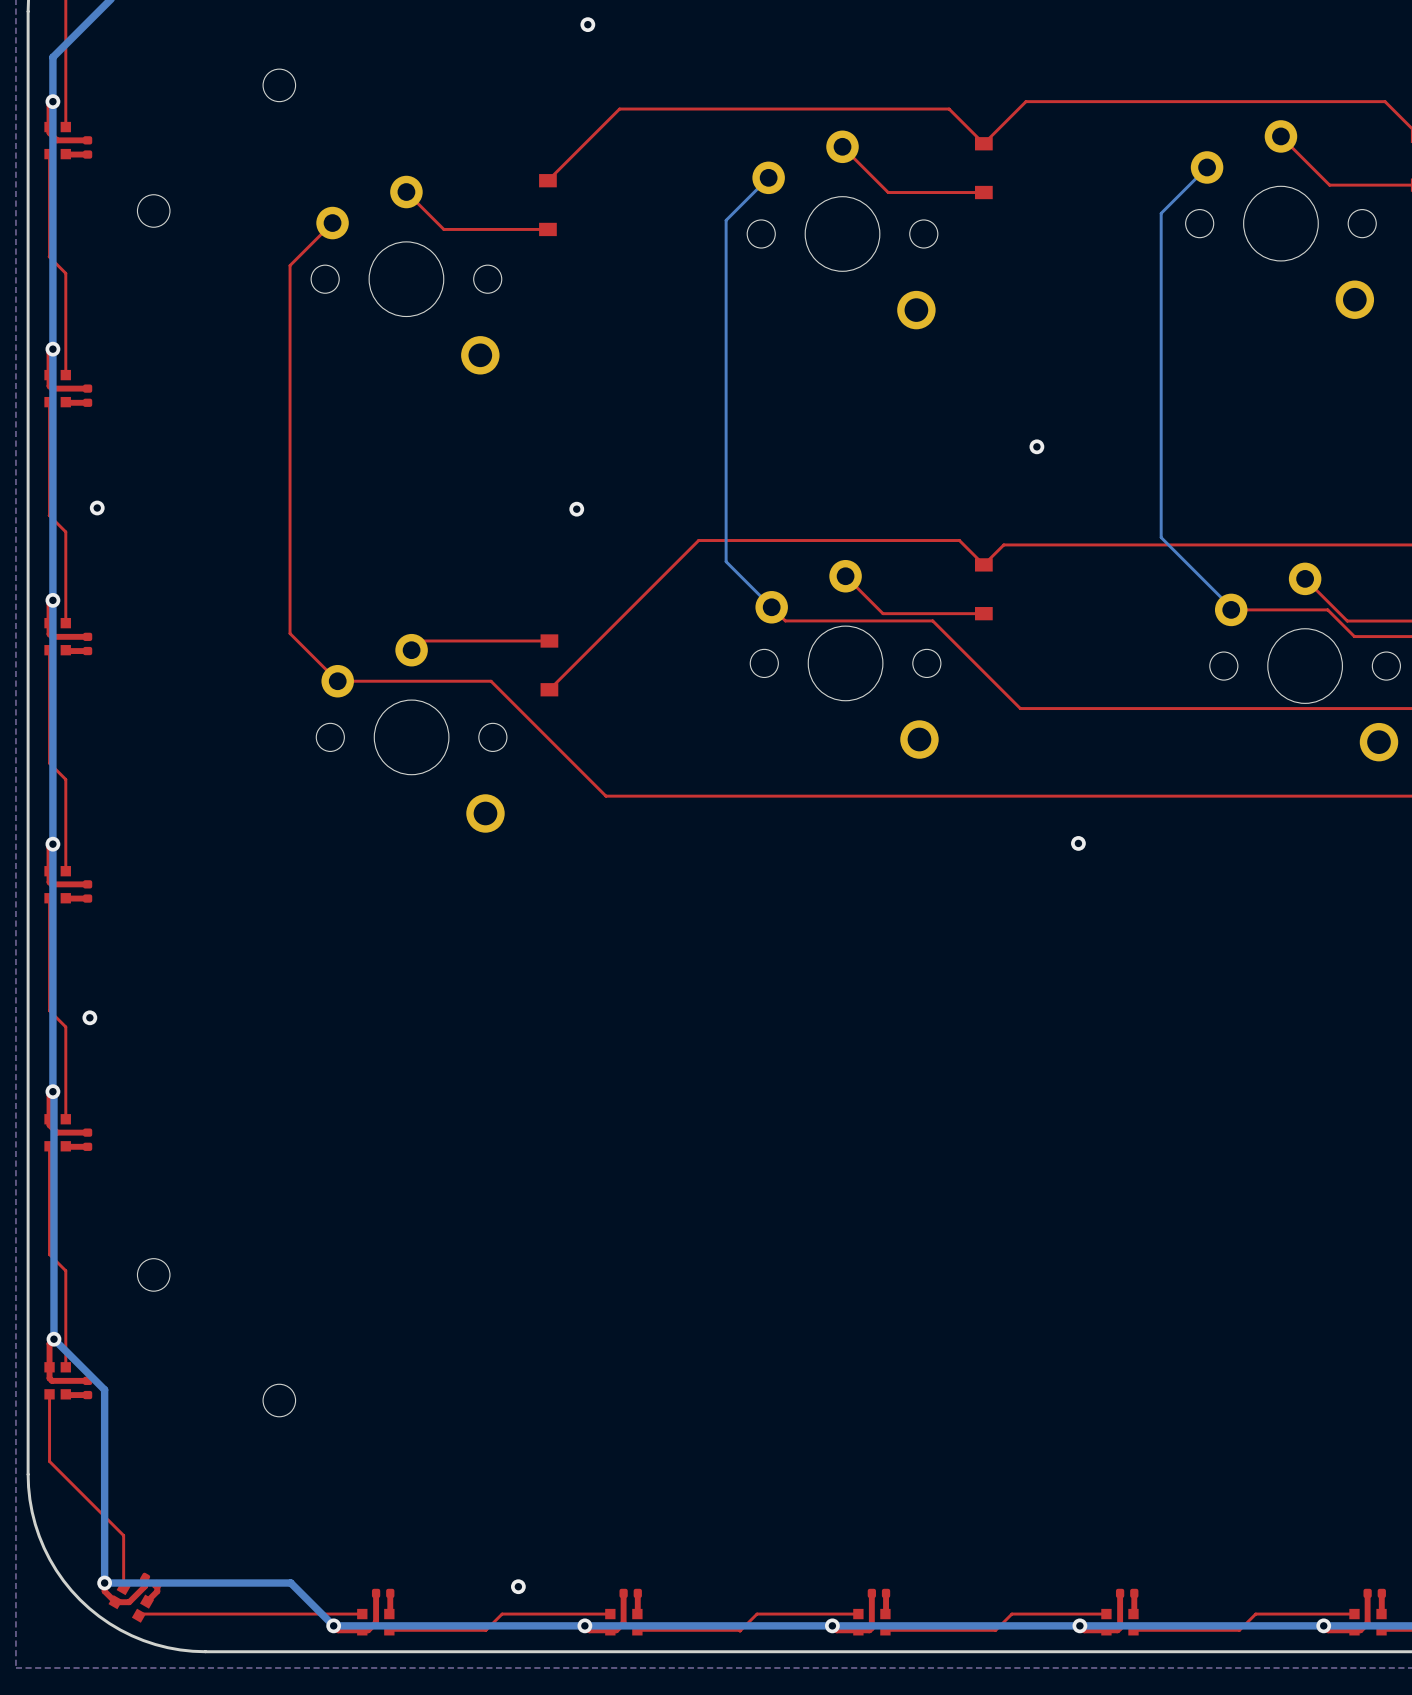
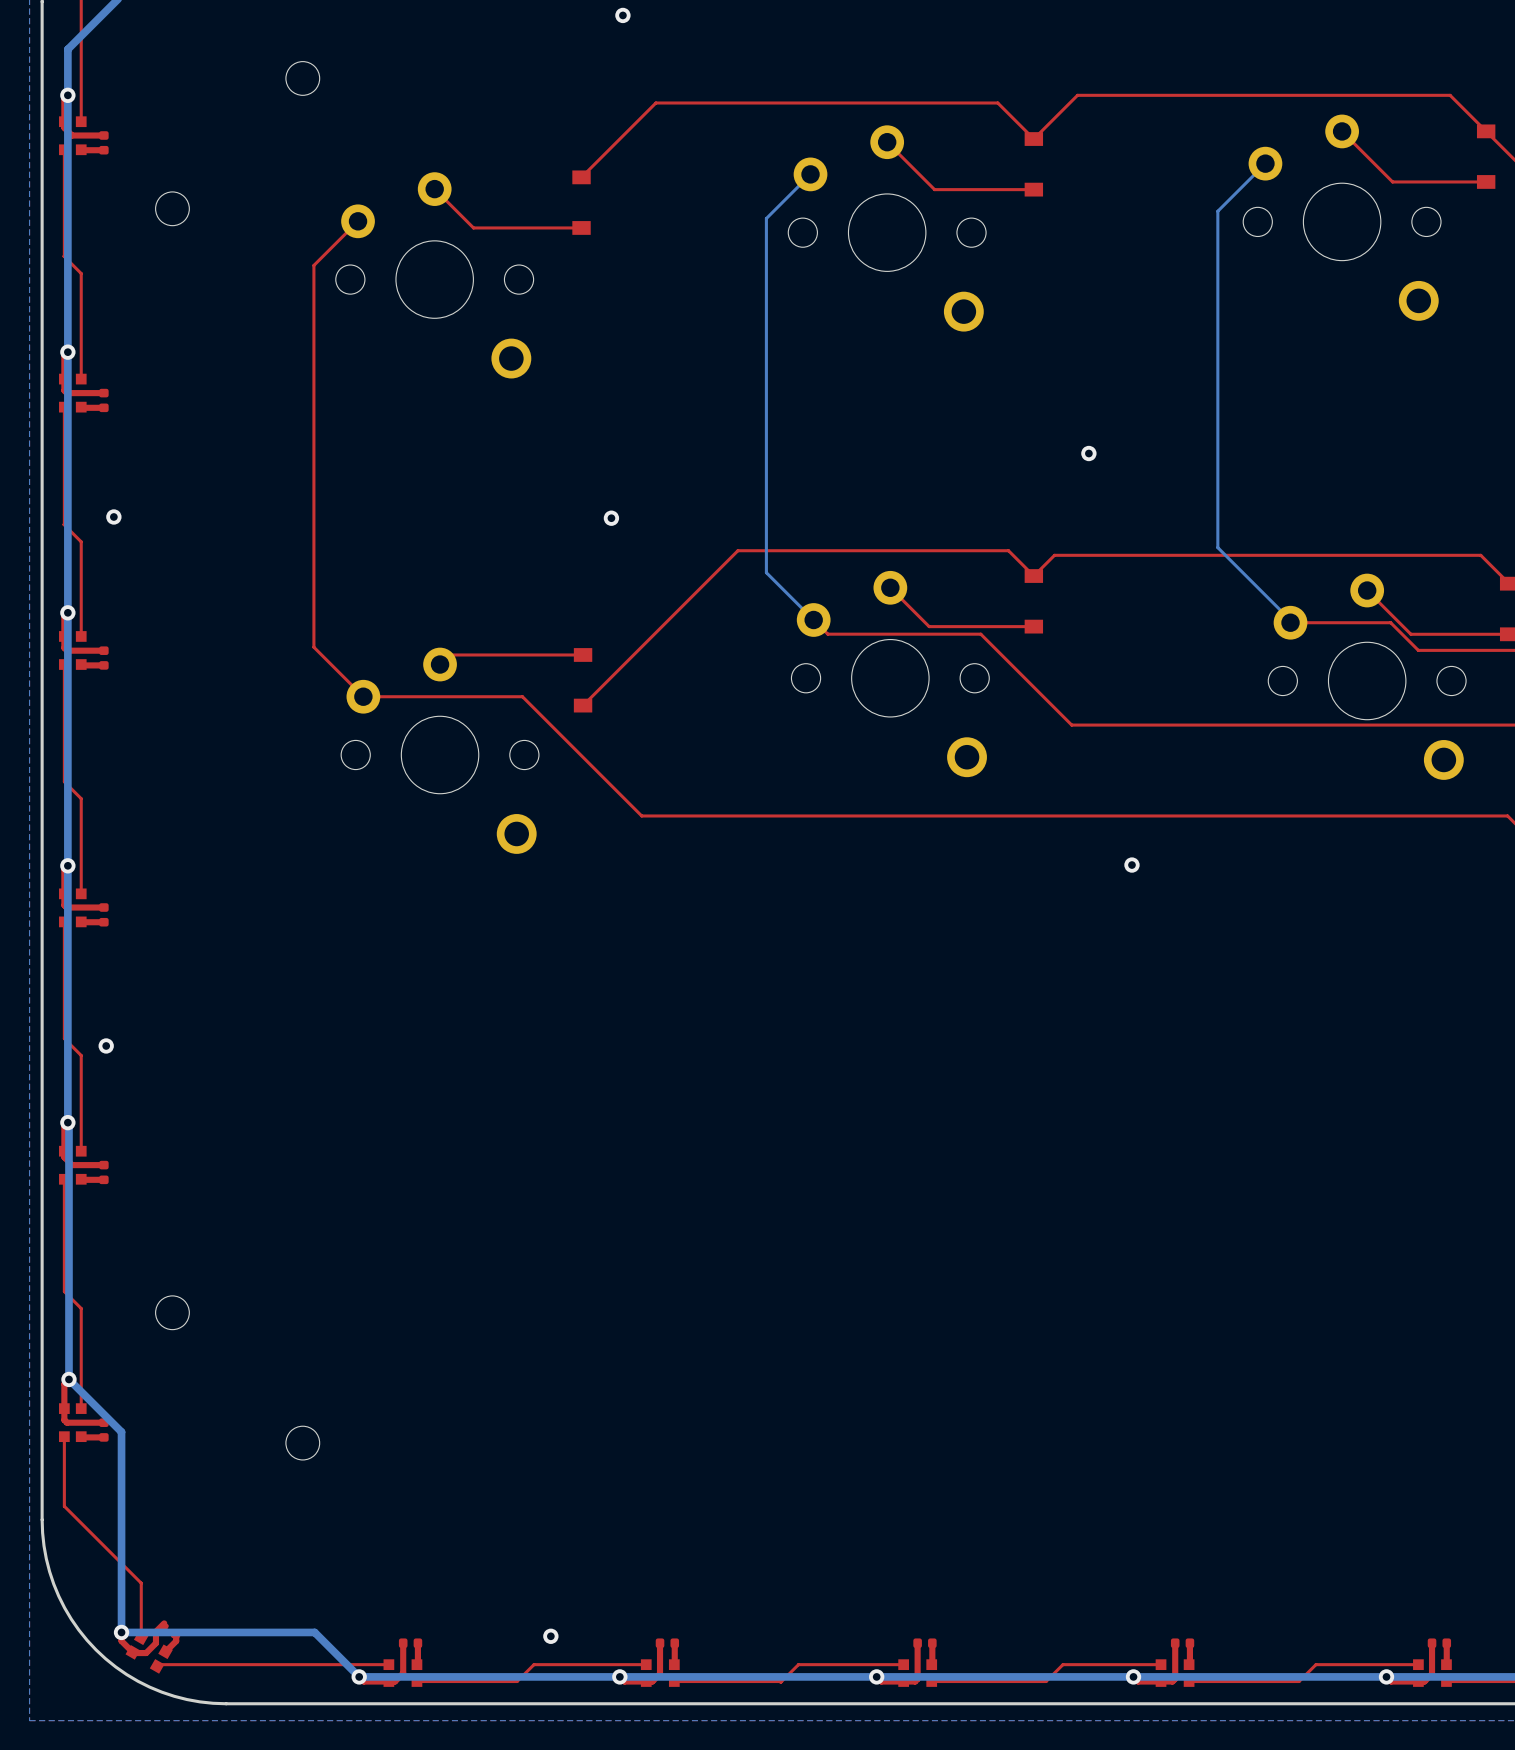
top track: none -> (164, 1623) (155, 1631) (155, 1643) (146, 1653) (130, 1653)
top track: (145, 1577) (145, 1586) (129, 1602) (115, 1602) -> none

